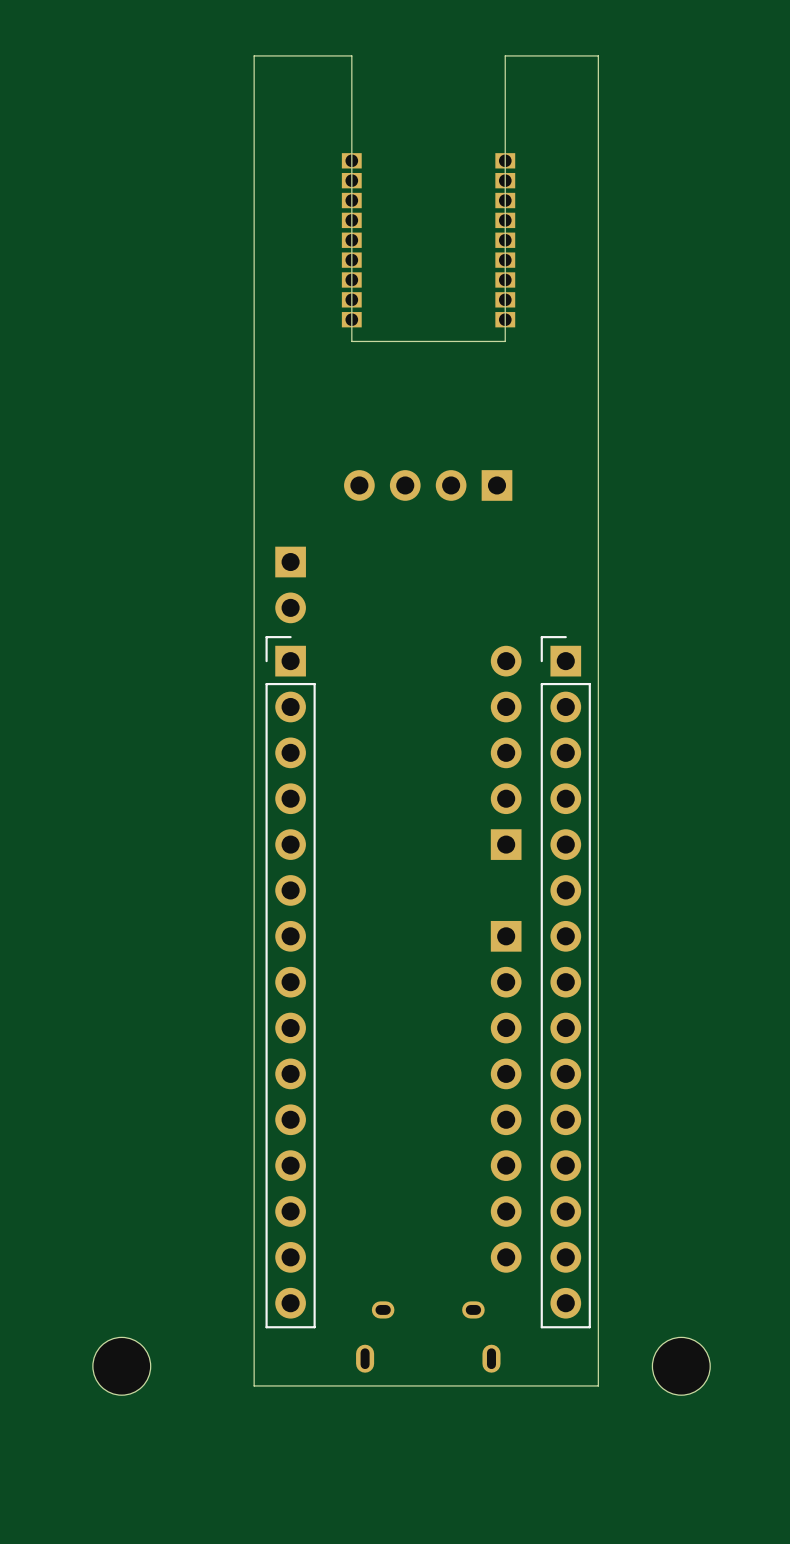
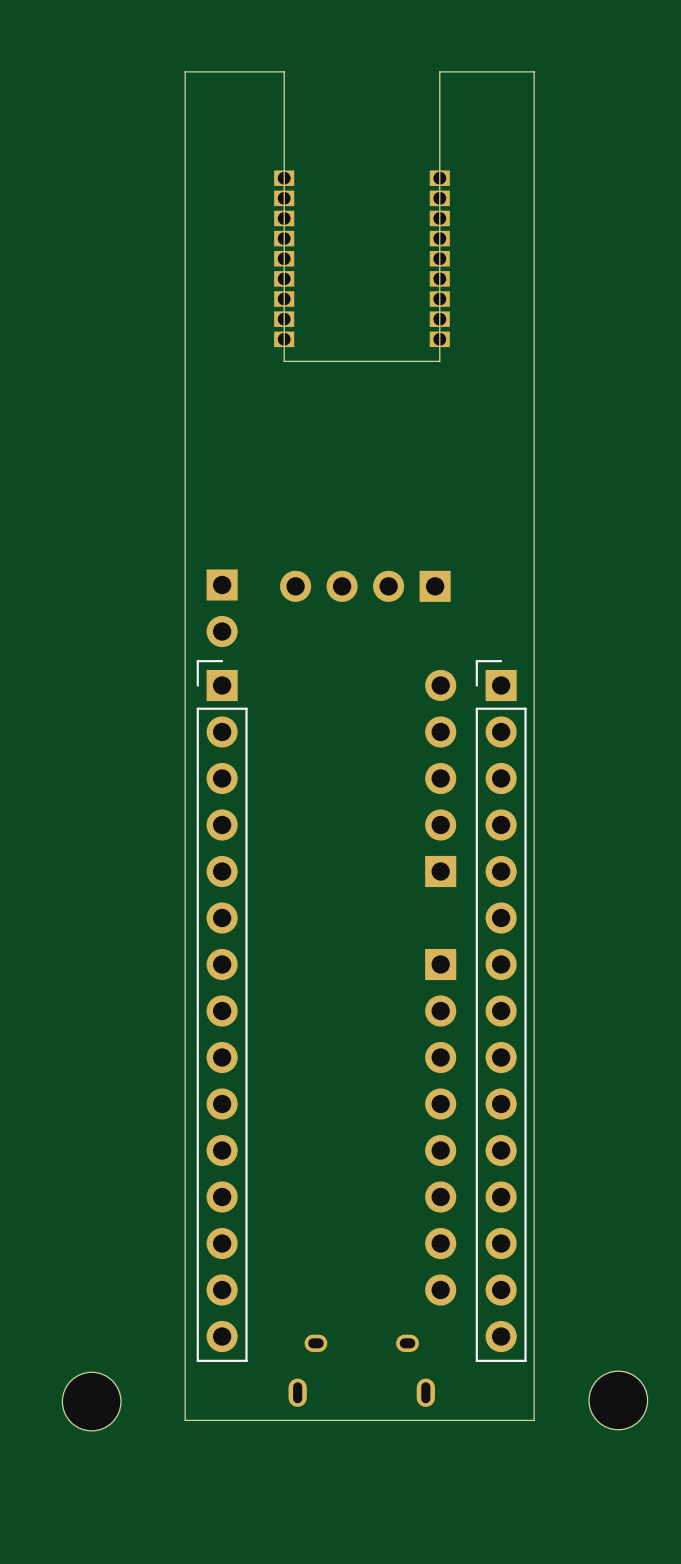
part position: (428, 485) -> (365, 586)
part position: (121, 1366) -> (91, 1401)

